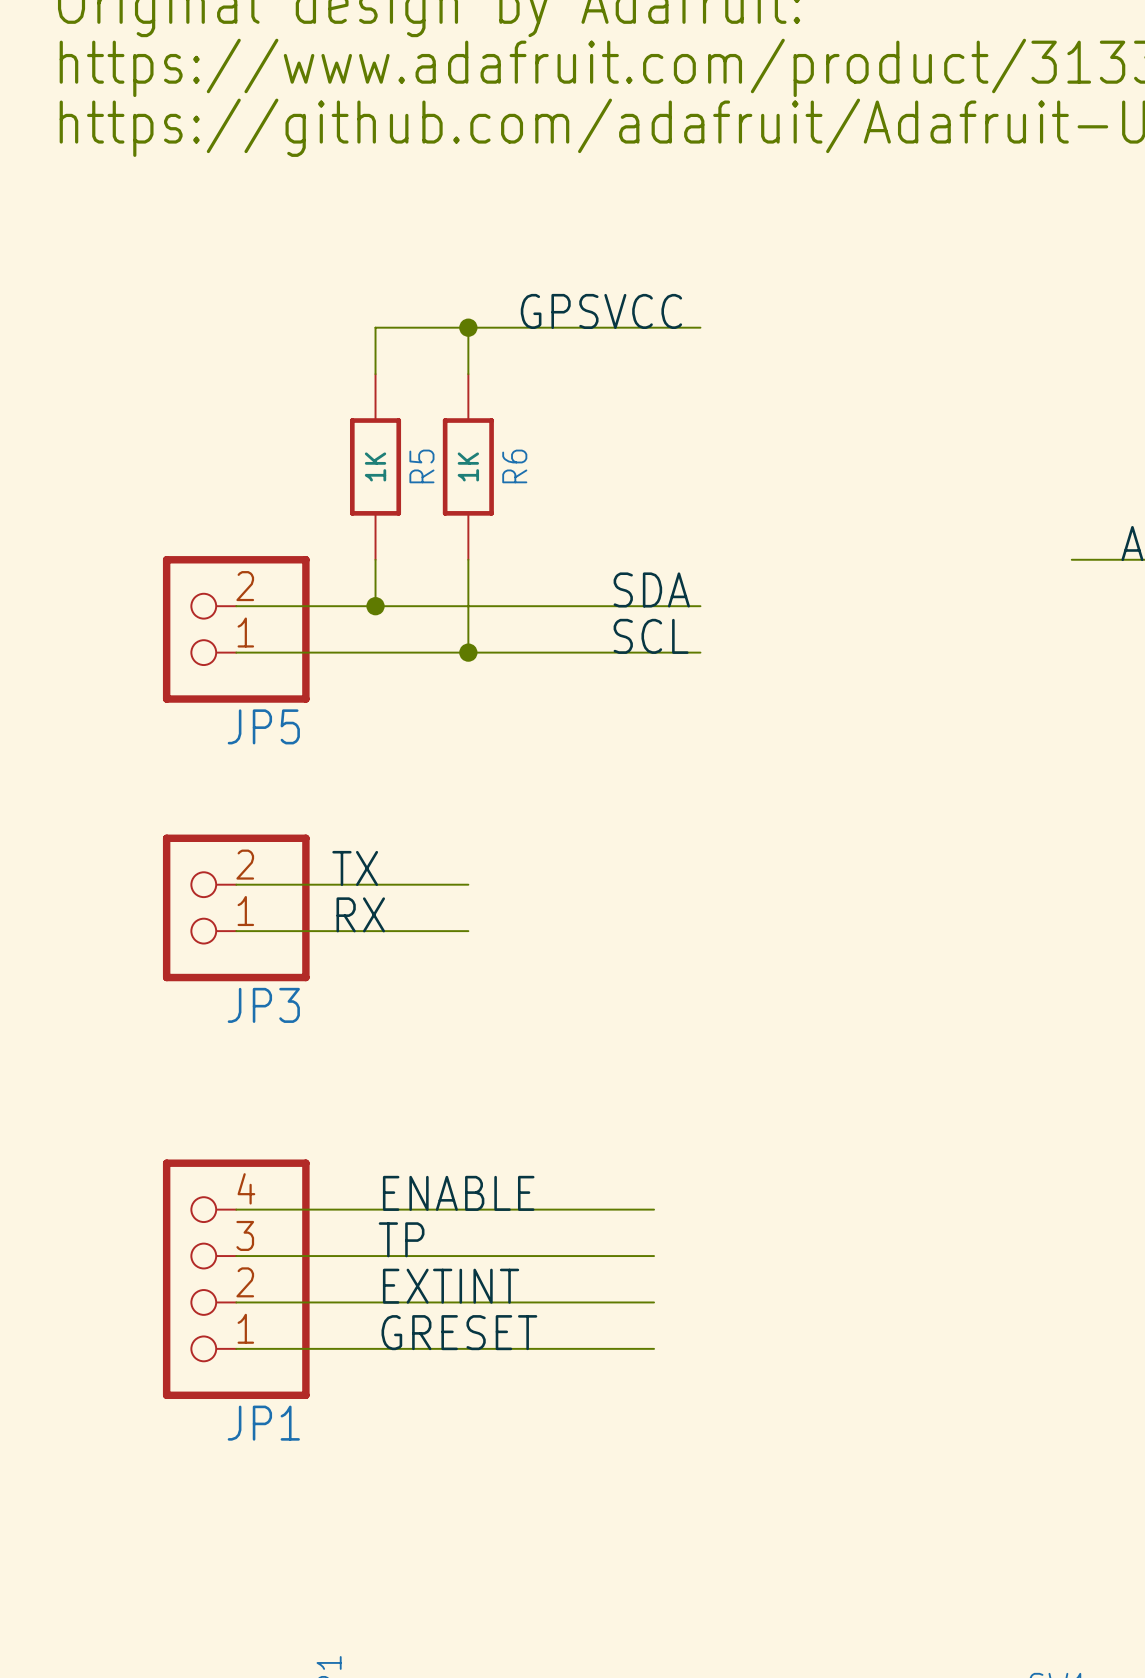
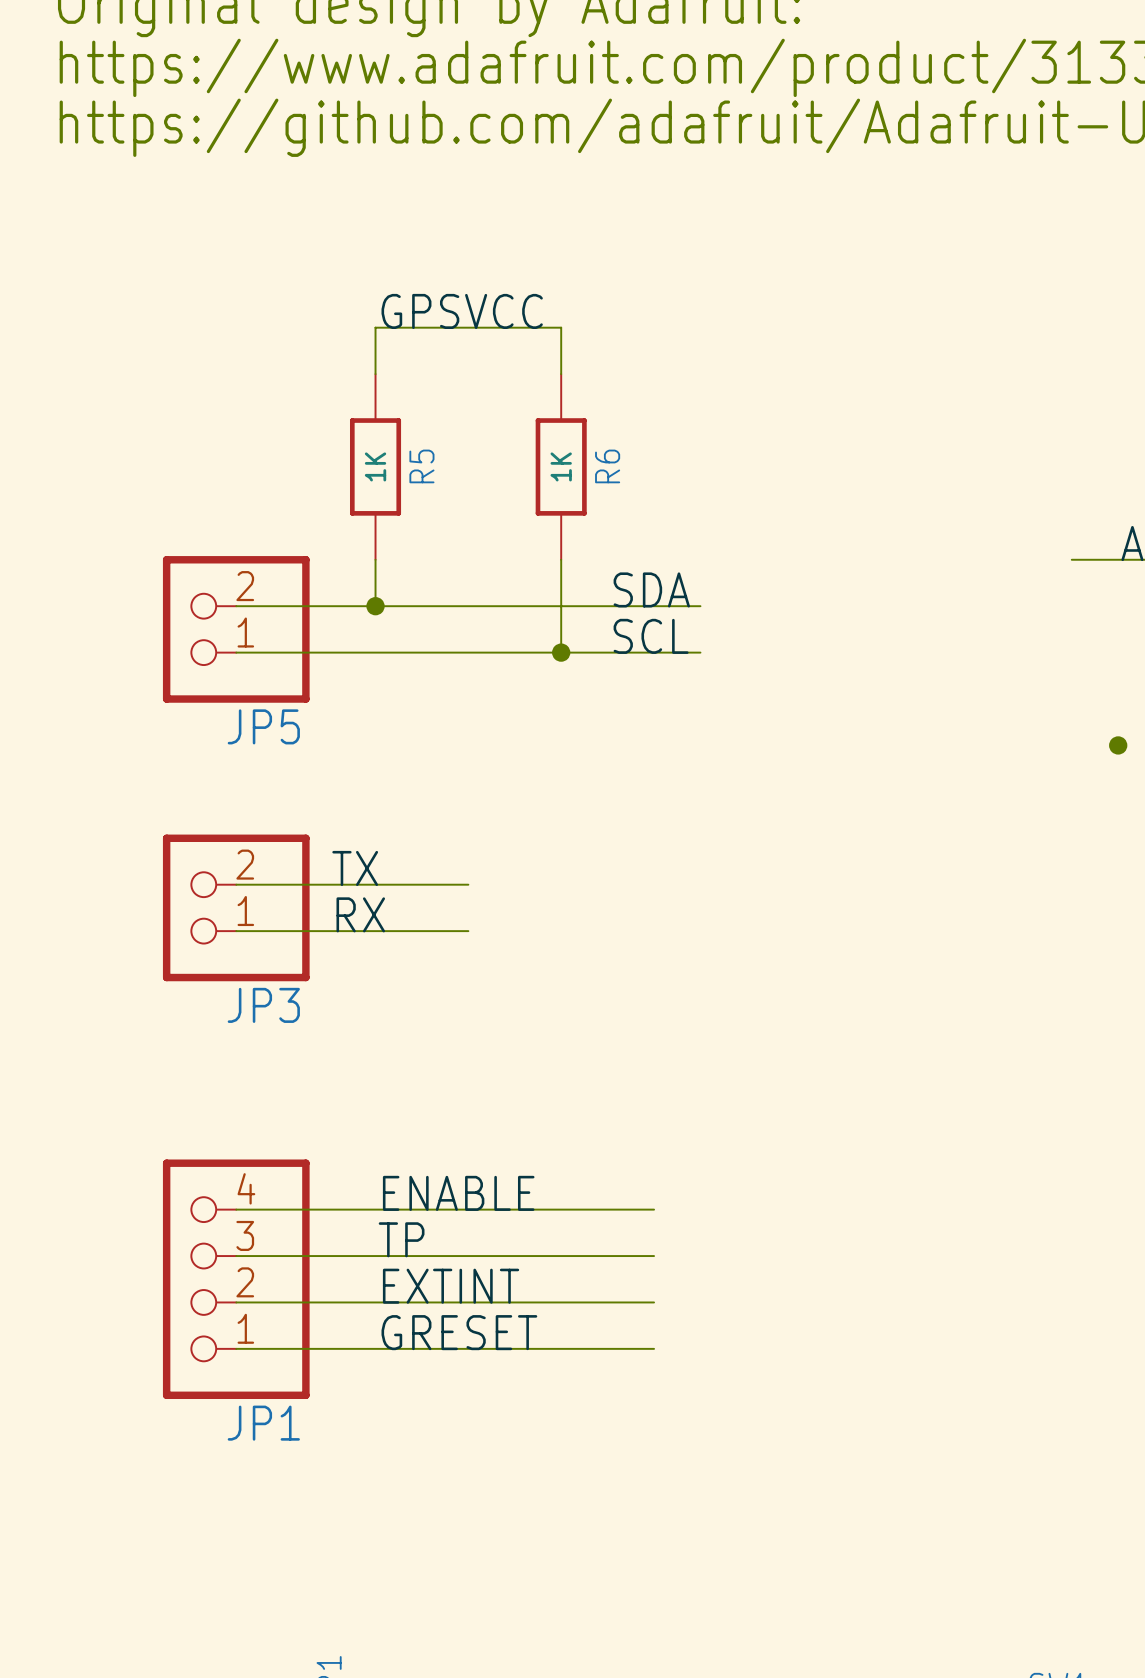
label position: GPSVCC (601, 311) -> GPSVCC (462, 311)
wire: (468, 327) (468, 374) -> none
junction: (468, 327) -> none
wire: (561, 327) (700, 327) -> (561, 327) (561, 374)
R6 position: (468, 466) -> (561, 466)
wire: (468, 559) (468, 652) -> (561, 559) (561, 652)
junction position: (468, 652) -> (561, 652)
junction: none -> (1118, 745)

